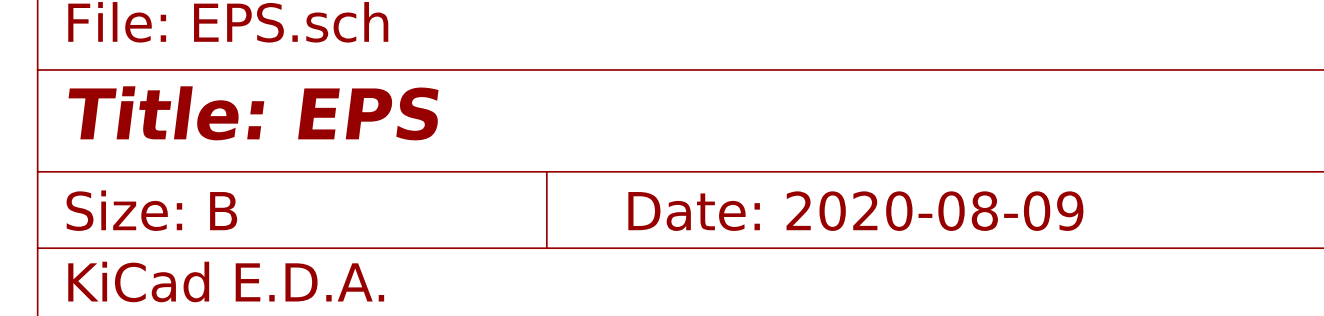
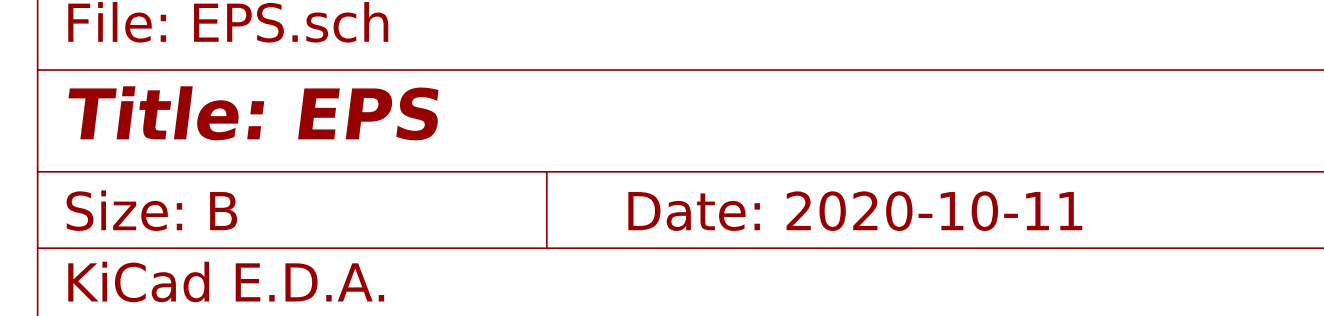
title block: Date: 2020-08-09 (855, 211) -> Date: 2020-10-11 (855, 211)

